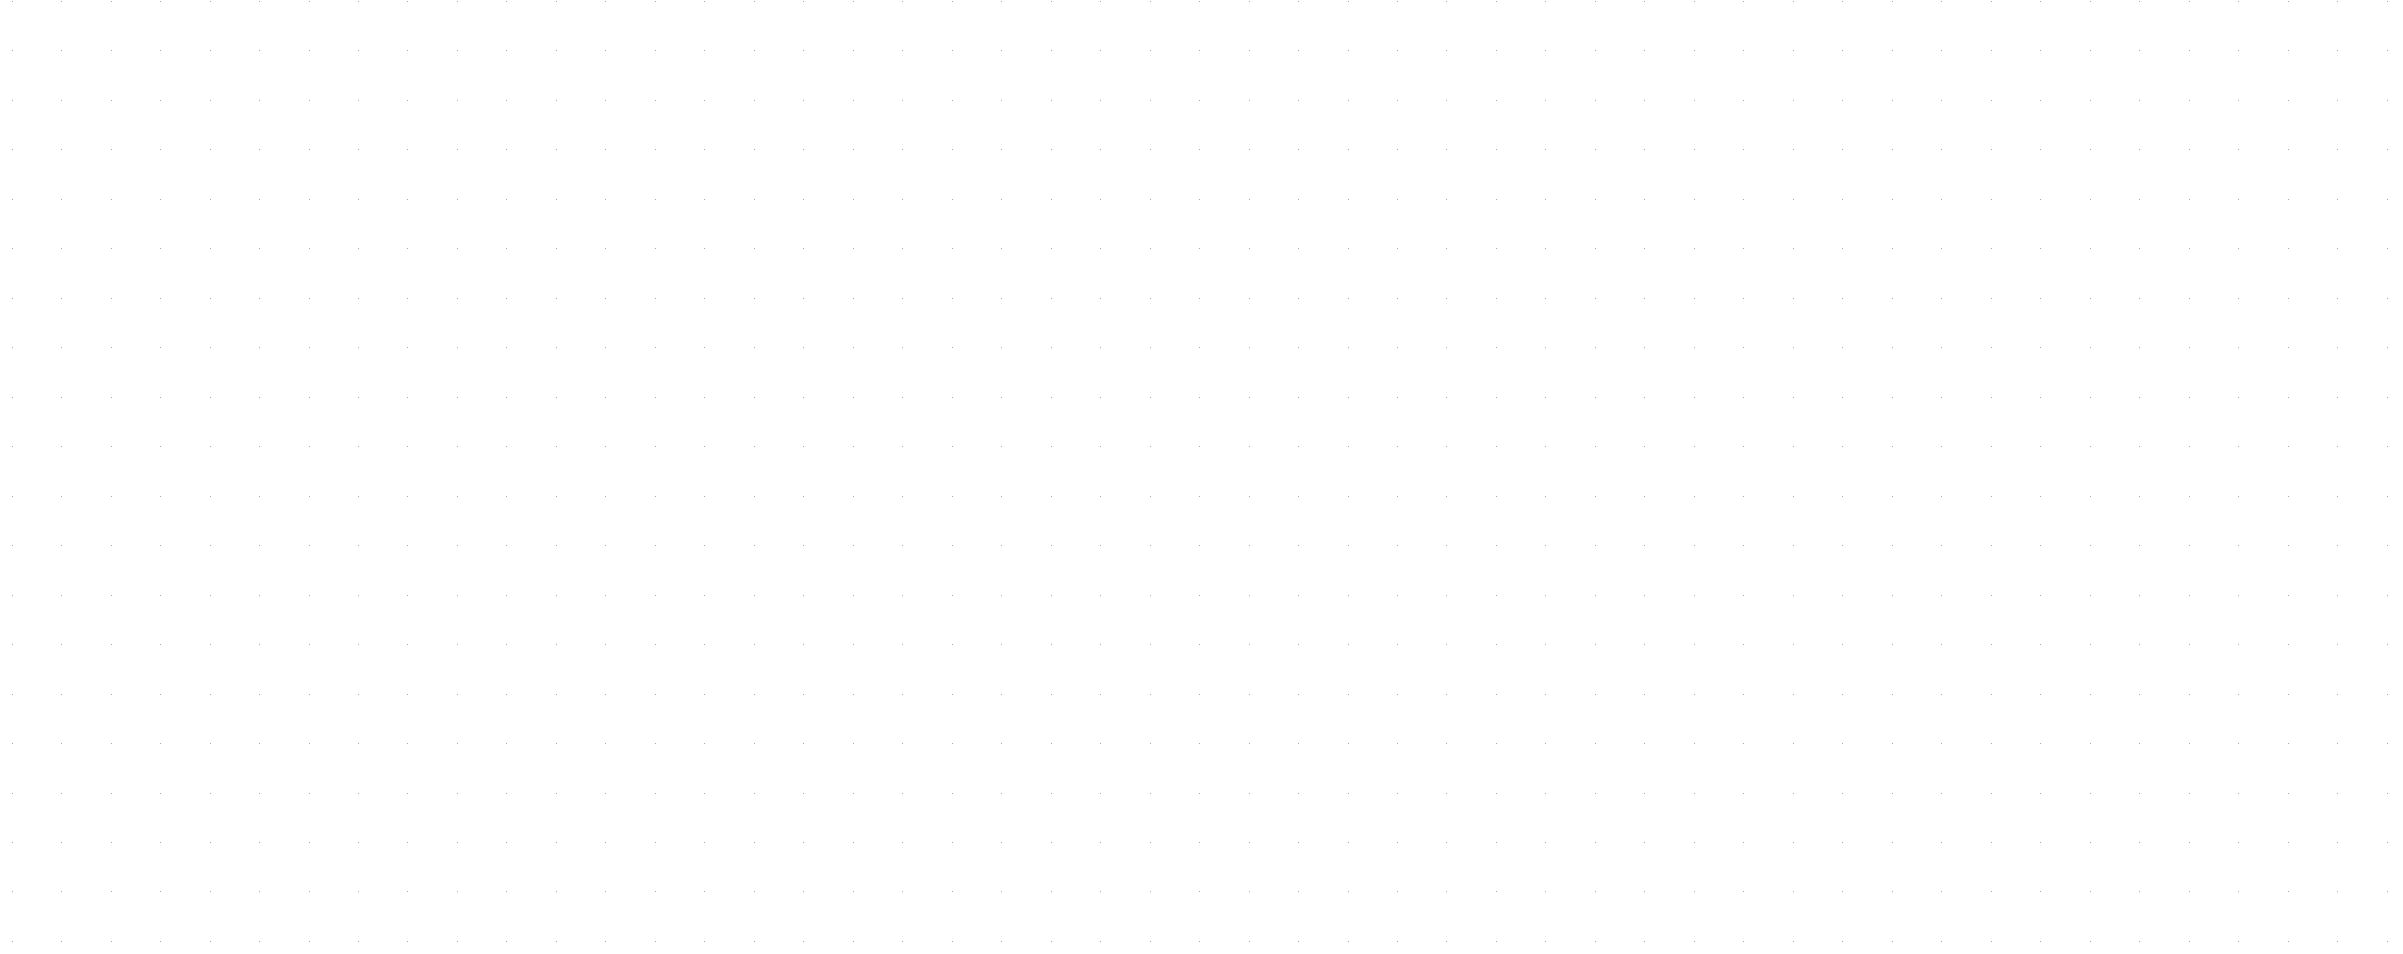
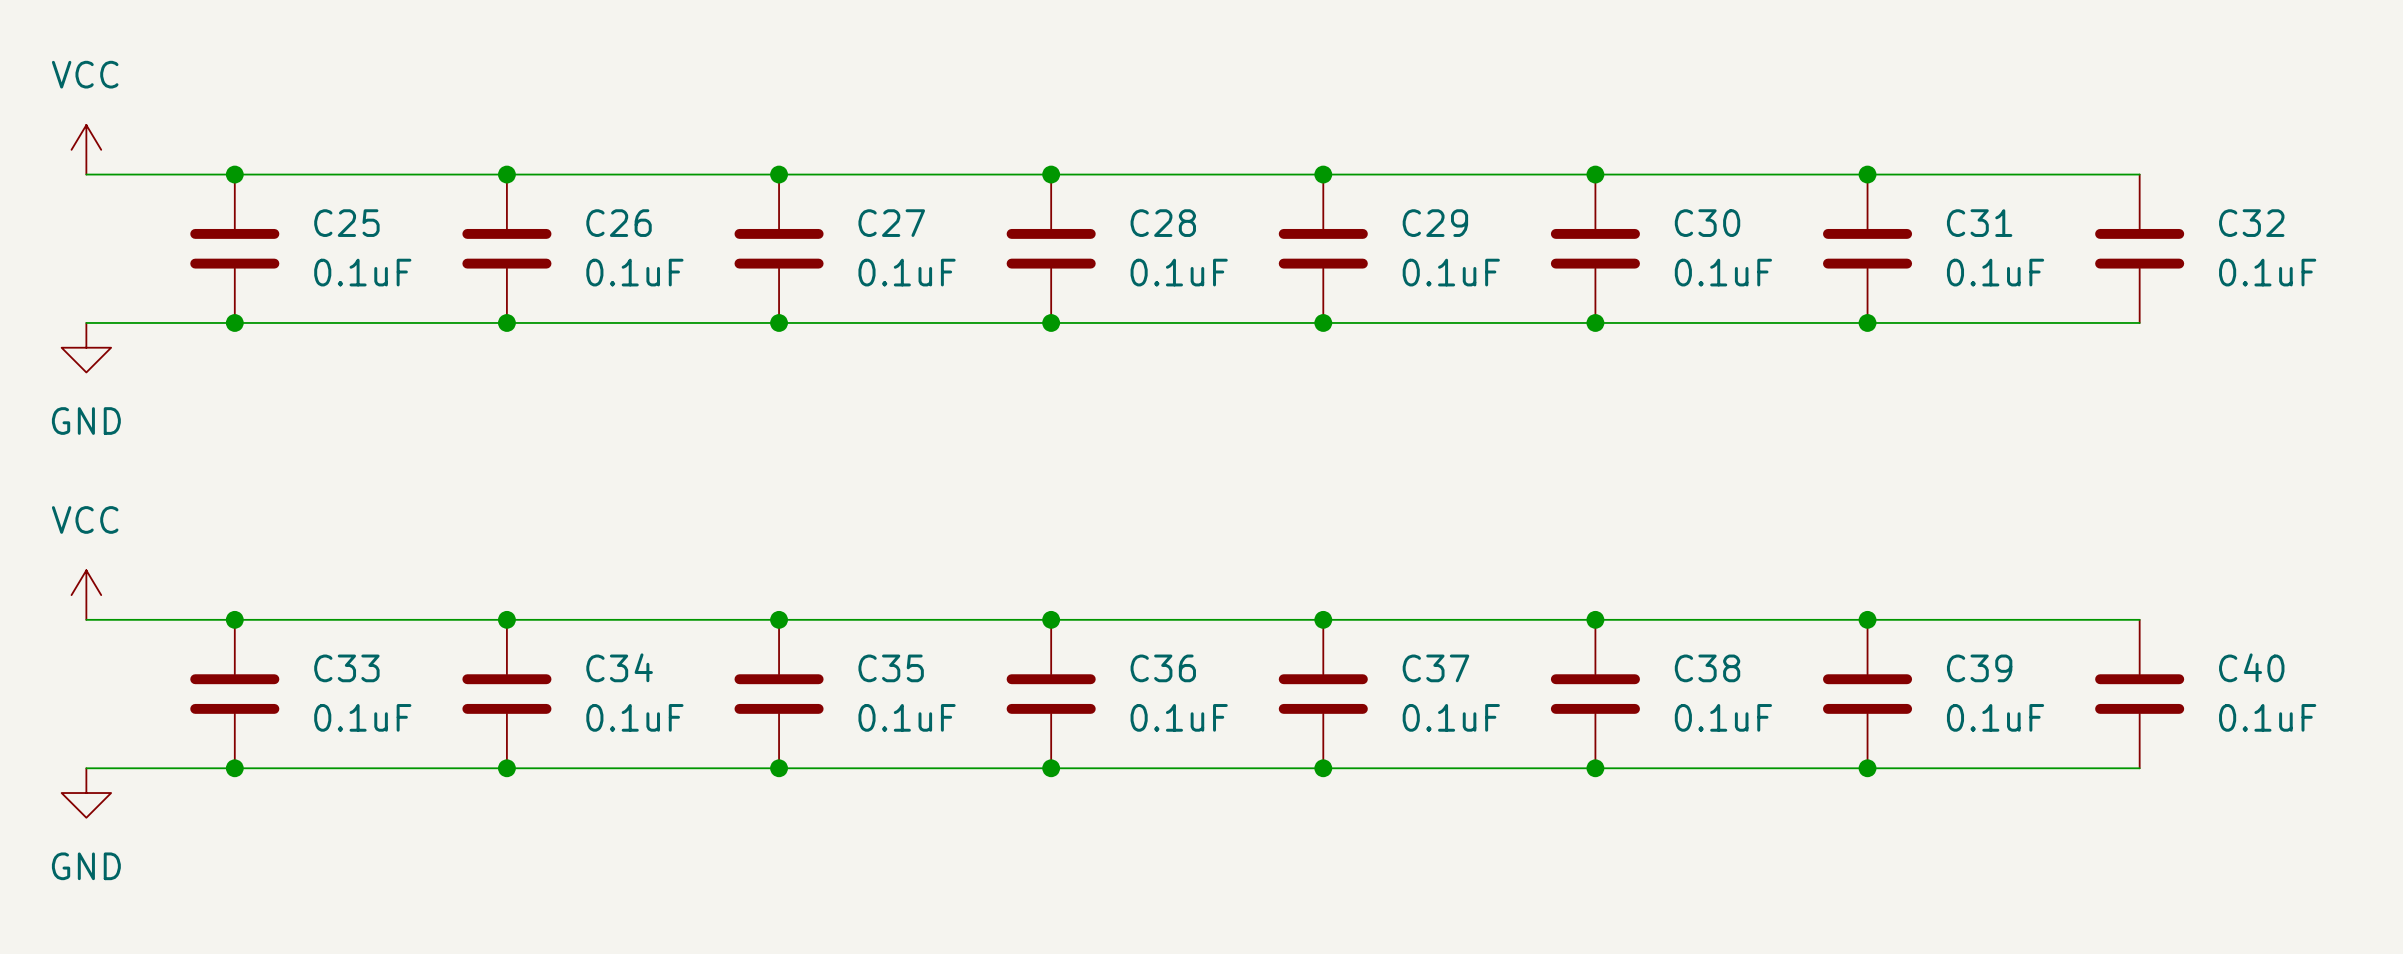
power symbol: none -> VCC (86, 149)
wire: none -> (86, 174) (2139, 174)
junction: none -> (234, 174)
junction: none -> (506, 174)
junction: none -> (779, 174)
junction: none -> (1051, 174)
junction: none -> (1323, 174)
junction: none -> (1595, 174)
junction: none -> (1867, 174)
C25: none -> 0.1uF (234, 248)
C26: none -> 0.1uF (506, 248)
C27: none -> 0.1uF (779, 248)
C28: none -> 0.1uF (1051, 248)
C29: none -> 0.1uF (1323, 248)
C30: none -> 0.1uF (1595, 248)
C31: none -> 0.1uF (1867, 248)
C32: none -> 0.1uF (2139, 248)
wire: none -> (86, 322) (2139, 322)
junction: none -> (234, 322)
junction: none -> (506, 322)
junction: none -> (779, 322)
junction: none -> (1051, 322)
junction: none -> (1323, 322)
junction: none -> (1595, 322)
junction: none -> (1867, 322)
power symbol: none -> GND (86, 347)
power symbol: none -> VCC (86, 595)
wire: none -> (86, 619) (2139, 619)
junction: none -> (234, 619)
junction: none -> (506, 619)
junction: none -> (779, 619)
junction: none -> (1051, 619)
junction: none -> (1323, 619)
junction: none -> (1595, 619)
junction: none -> (1867, 619)
C33: none -> 0.1uF (234, 694)
C34: none -> 0.1uF (506, 694)
C35: none -> 0.1uF (779, 694)
C36: none -> 0.1uF (1051, 694)
C37: none -> 0.1uF (1323, 694)
C38: none -> 0.1uF (1595, 694)
C39: none -> 0.1uF (1867, 694)
C40: none -> 0.1uF (2139, 694)
wire: none -> (86, 768) (2139, 768)
junction: none -> (234, 768)
junction: none -> (506, 768)
junction: none -> (779, 768)
junction: none -> (1051, 768)
junction: none -> (1323, 768)
junction: none -> (1595, 768)
junction: none -> (1867, 768)
power symbol: none -> GND (86, 793)

